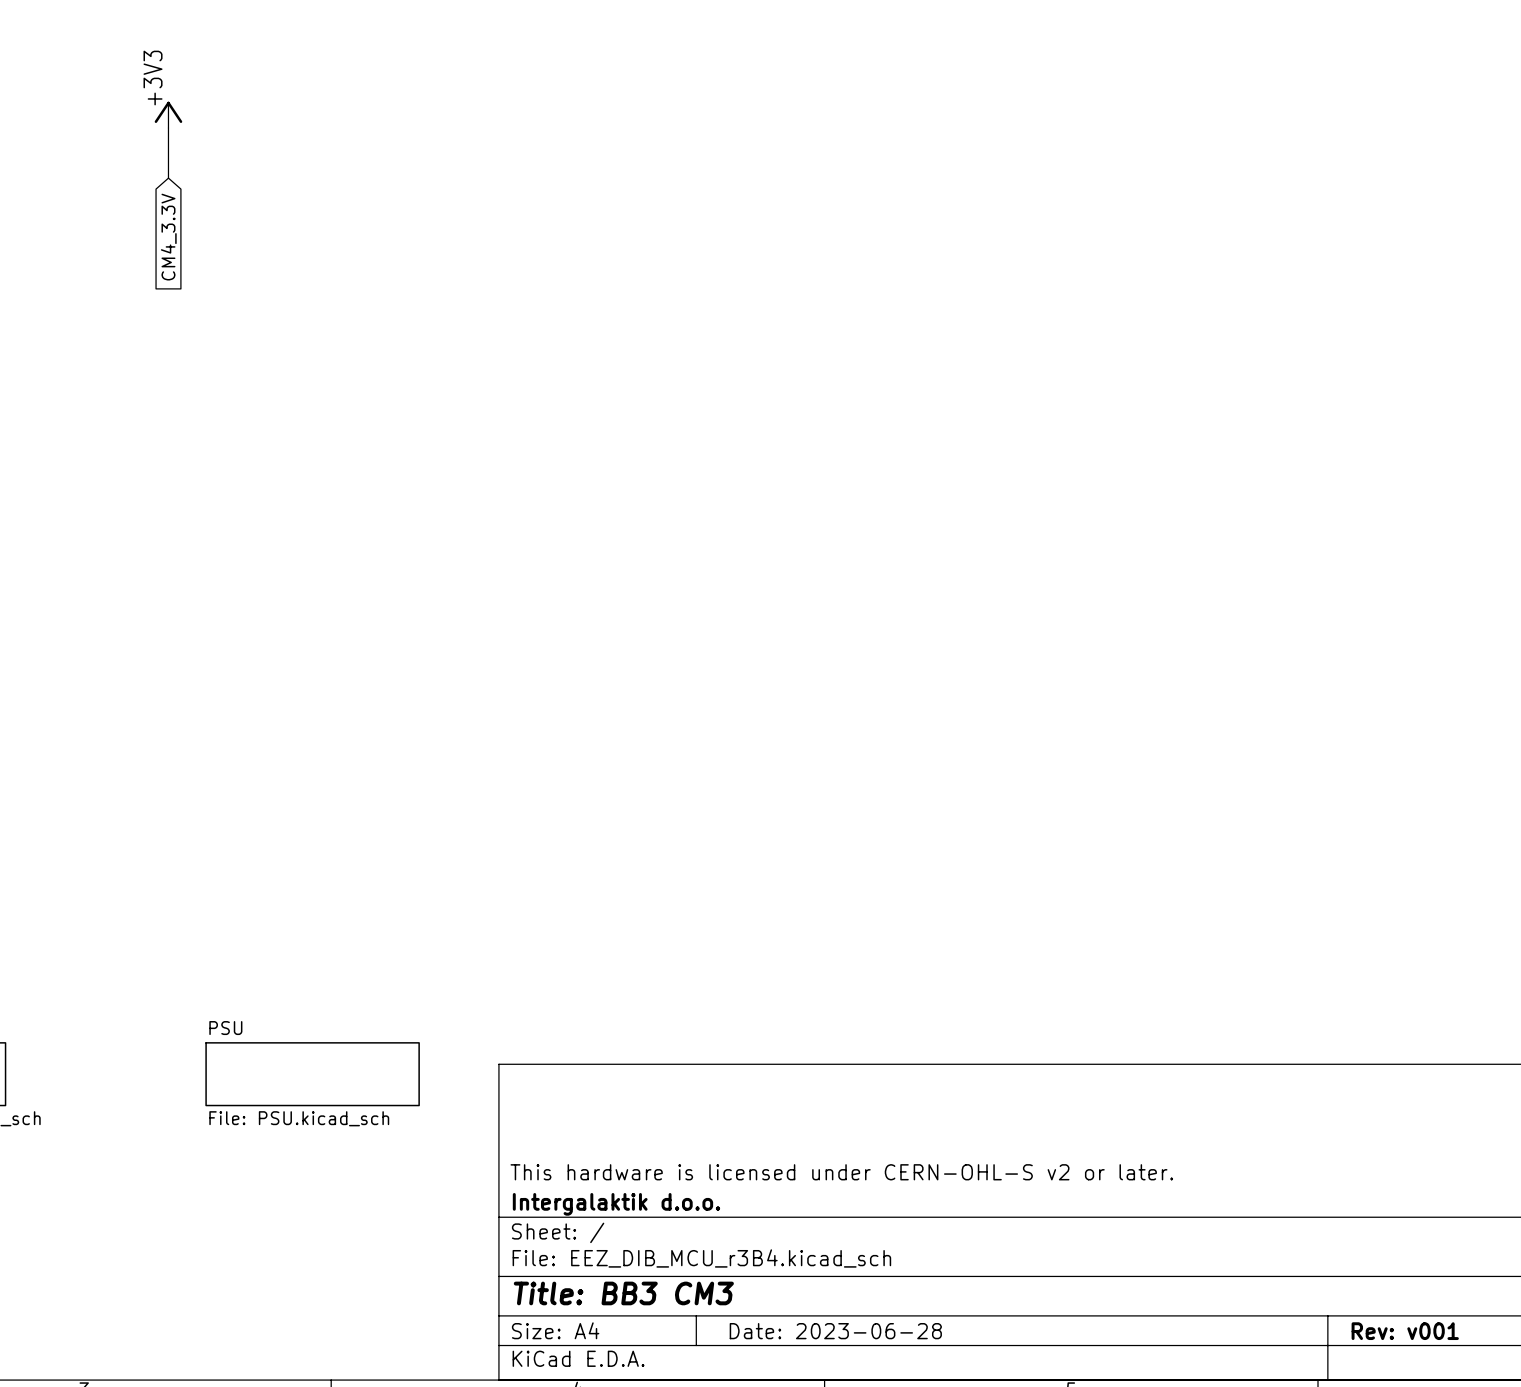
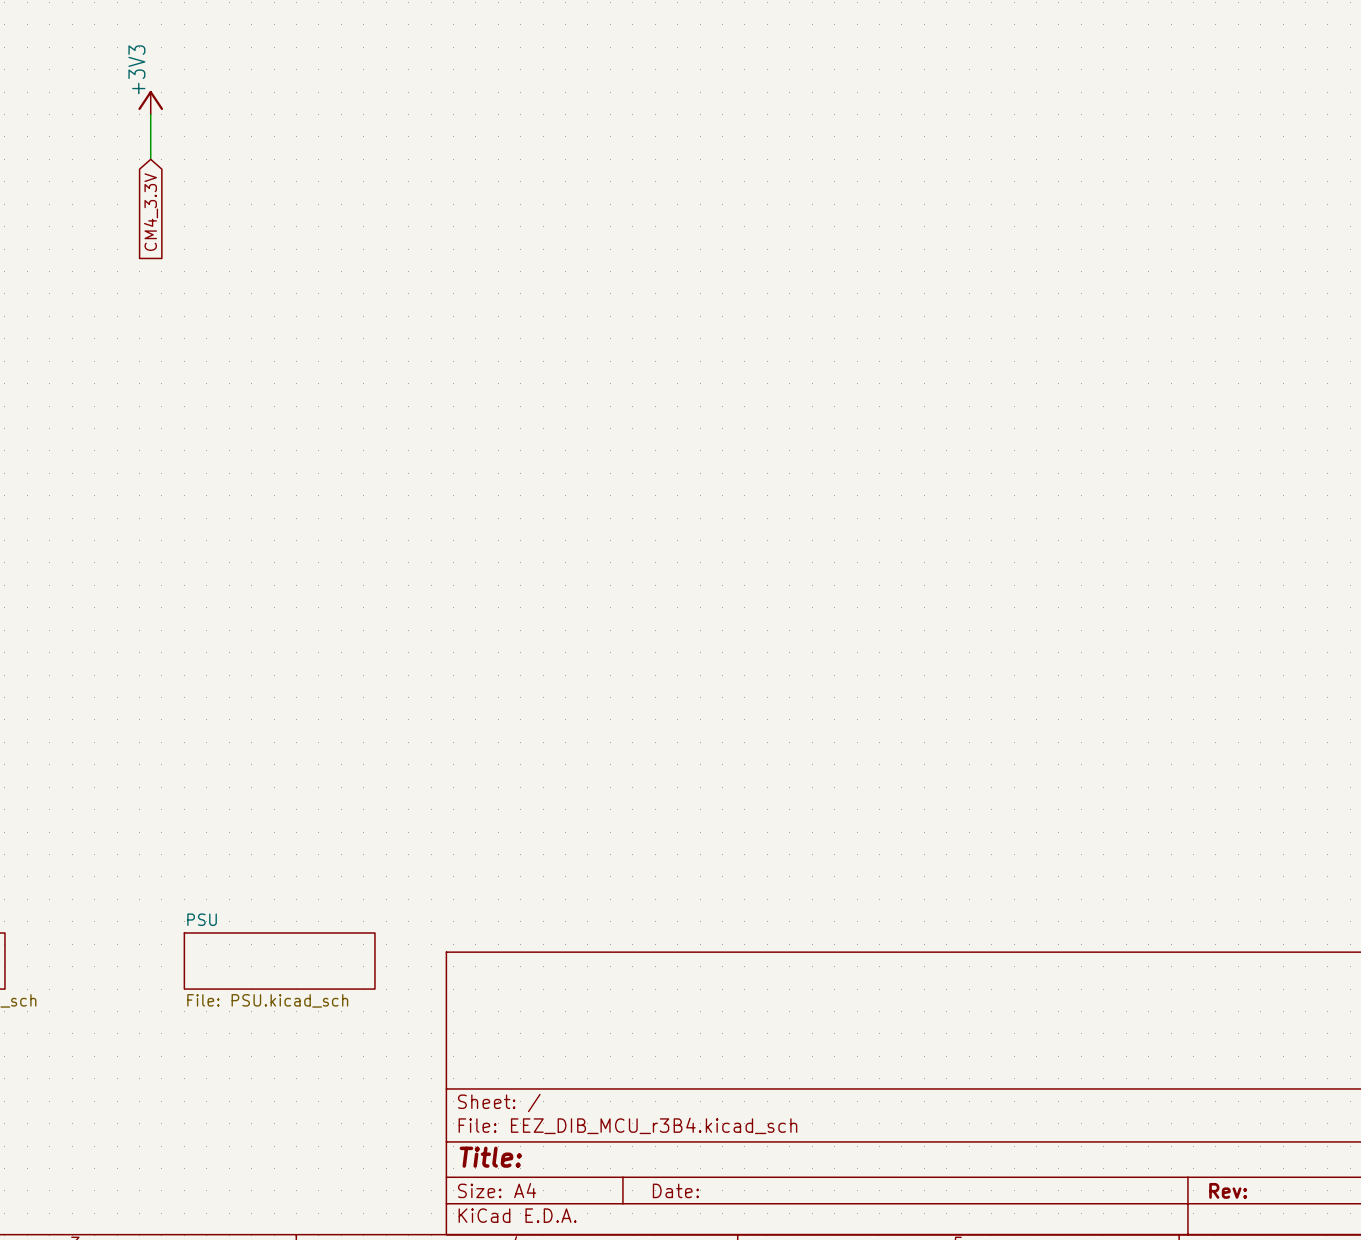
title block: This hardware is licensed under CERN-OHL-S v2 or later. (841, 1172) -> none
title block: Intergalaktik d.o.o. (616, 1204) -> none
title block: Title: BB3 CM3 (623, 1293) -> Title: (490, 1157)
title block: Date: 2023-06-28 (835, 1331) -> Date: (675, 1190)
title block: Rev: v001 (1405, 1331) -> Rev: (1228, 1190)

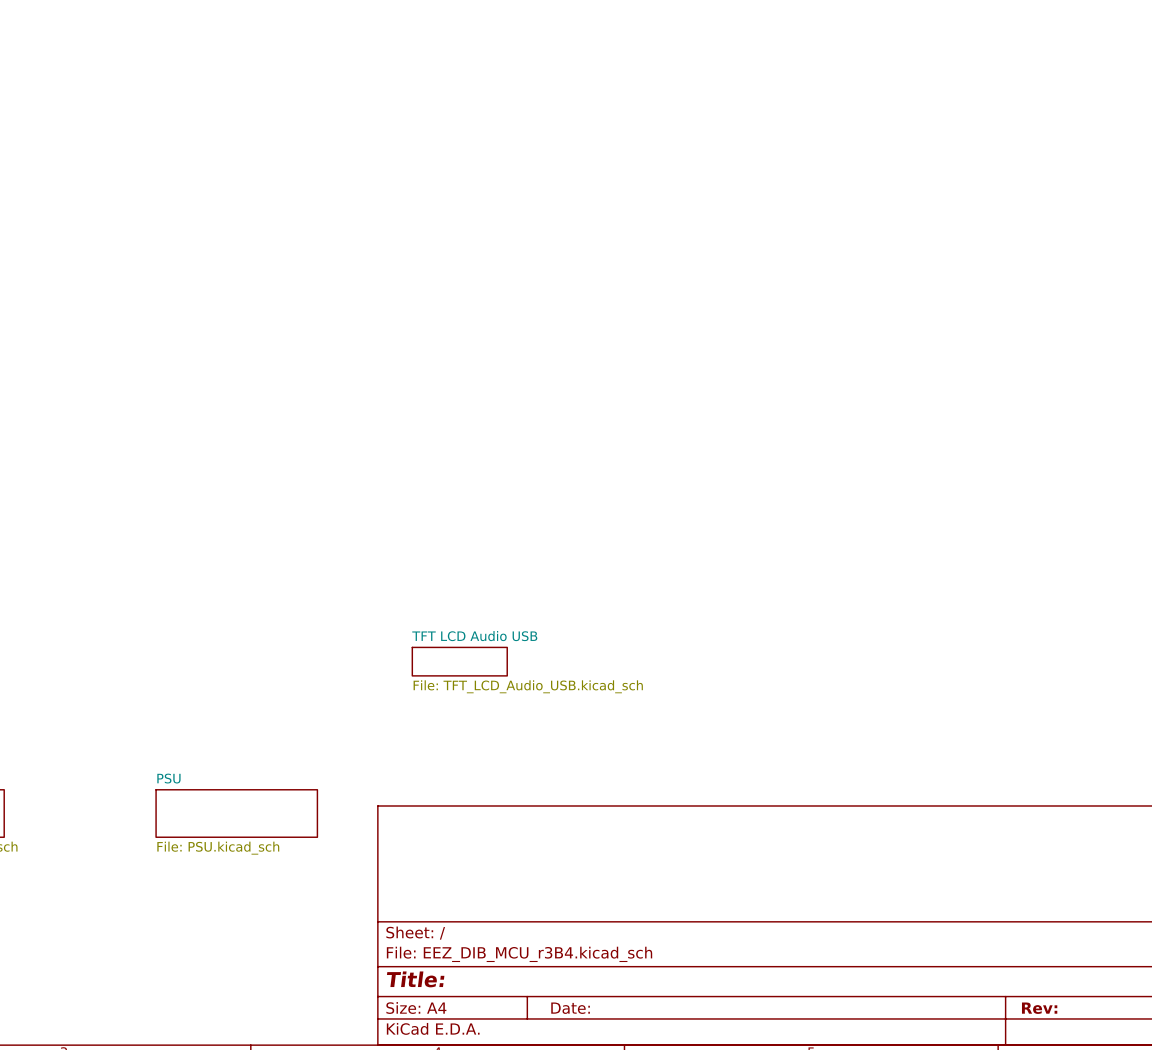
power symbol: +3V3 (150, 102) -> none
wire: (150, 114) (150, 159) -> none
global label: CM4_3.3V (150, 212) -> none
sheet TFT LCD Audio USB: none -> File: TFT_LCD_Audio_USB.kicad_sch (459, 661)

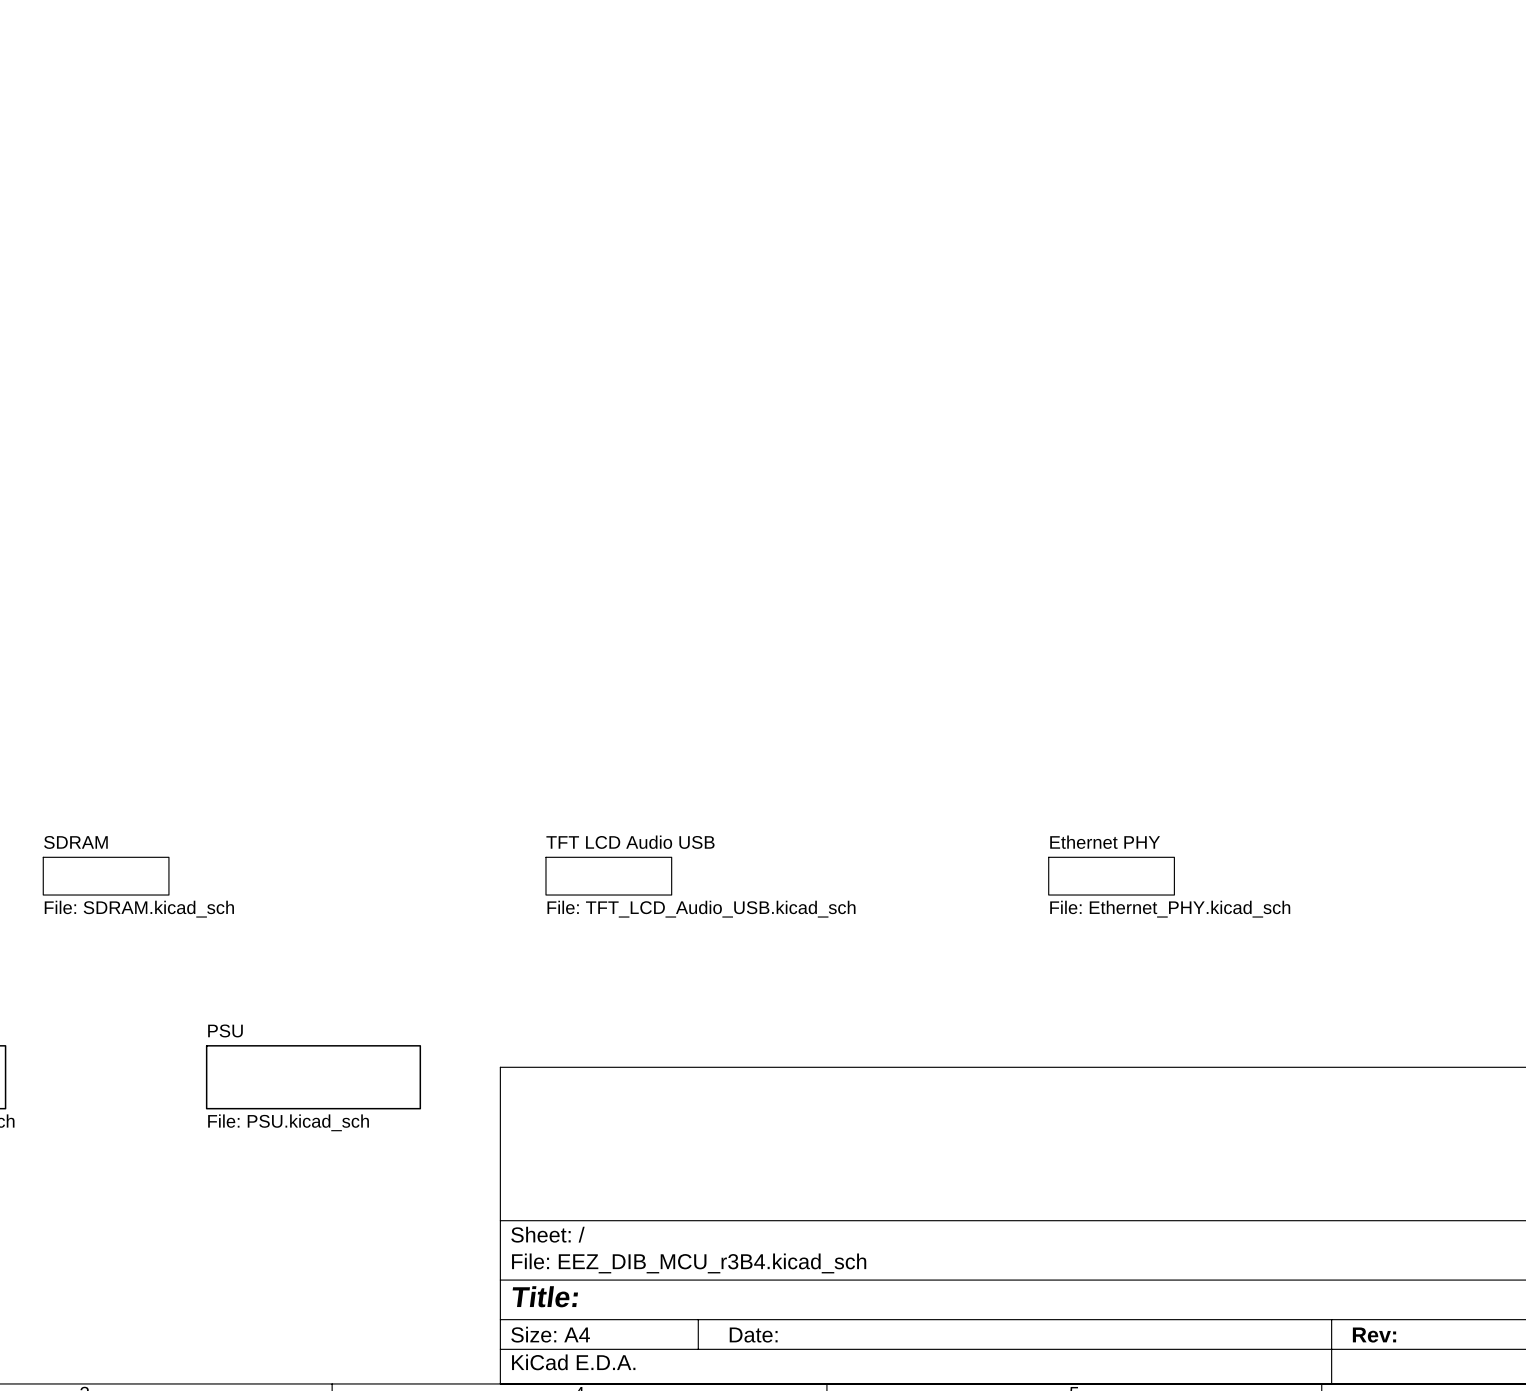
sheet SDRAM: none -> File: SDRAM.kicad_sch (106, 876)
sheet Ethernet PHY: none -> File: Ethernet_PHY.kicad_sch (1111, 876)

